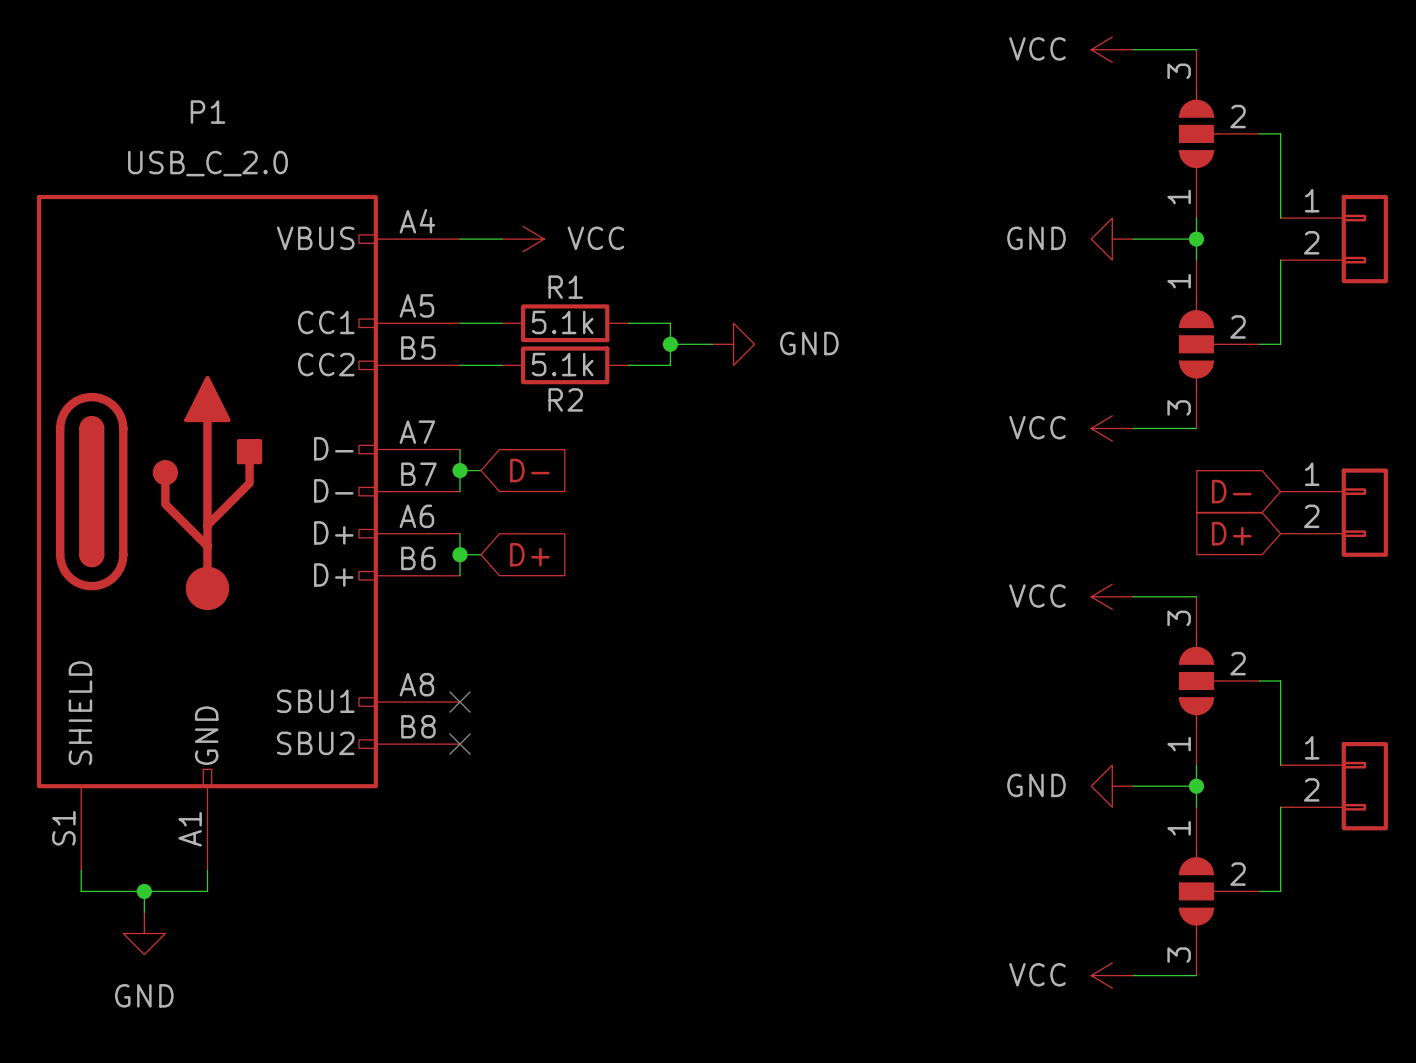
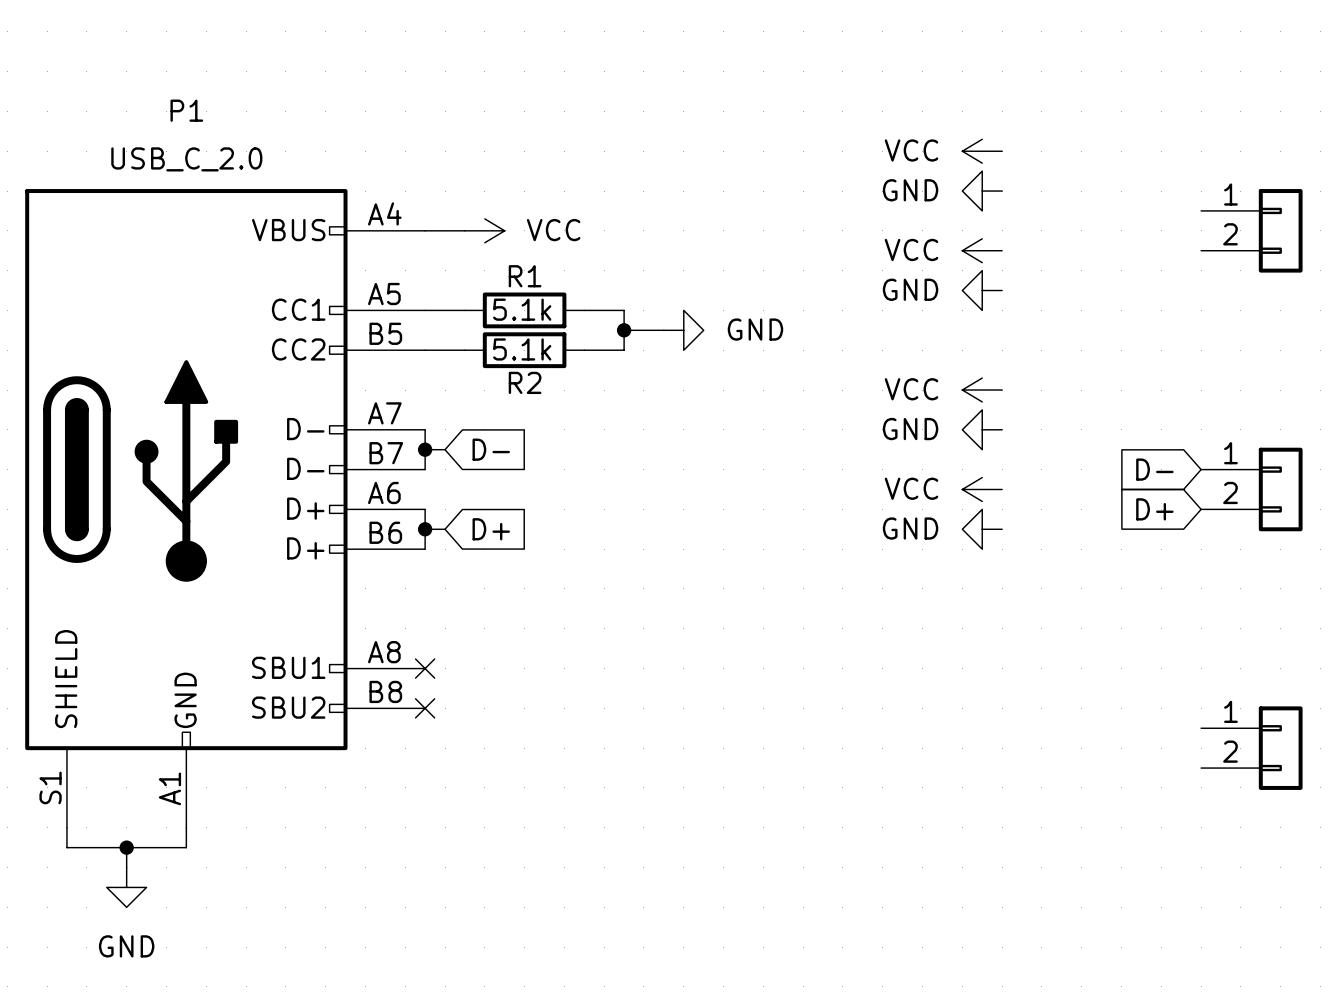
power symbol: VCC (1112, 49) -> none
wire: (1133, 49) (1196, 49) -> none
part: (1219, 133) -> none
wire: (1259, 133) (1280, 133) (1280, 218) -> none
power symbol: none -> VCC (982, 151)
power symbol: none -> GND (982, 191)
wire: (1196, 218) (1196, 260) -> none
power symbol: GND (1112, 239) -> none
wire: (1133, 239) (1196, 239) -> none
junction: (1196, 239) -> none
power symbol: none -> VCC (982, 250)
wire: (1280, 260) (1280, 344) (1259, 344) -> none
power symbol: none -> GND (982, 290)
part: (1219, 344) -> none
power symbol: none -> VCC (982, 390)
power symbol: VCC (1112, 428) -> none
wire: (1133, 428) (1196, 428) -> none
power symbol: none -> GND (982, 429)
power symbol: none -> VCC (982, 489)
power symbol: none -> GND (982, 529)
power symbol: VCC (1112, 596) -> none
wire: (1133, 596) (1196, 596) -> none
part: (1219, 680) -> none
wire: (1259, 680) (1280, 680) (1280, 765) -> none
wire: (1196, 765) (1196, 807) -> none
power symbol: GND (1112, 786) -> none
wire: (1133, 786) (1196, 786) -> none
junction: (1196, 786) -> none
wire: (1280, 807) (1280, 891) (1259, 891) -> none
part: (1219, 891) -> none
power symbol: VCC (1112, 975) -> none
wire: (1133, 975) (1196, 975) -> none

